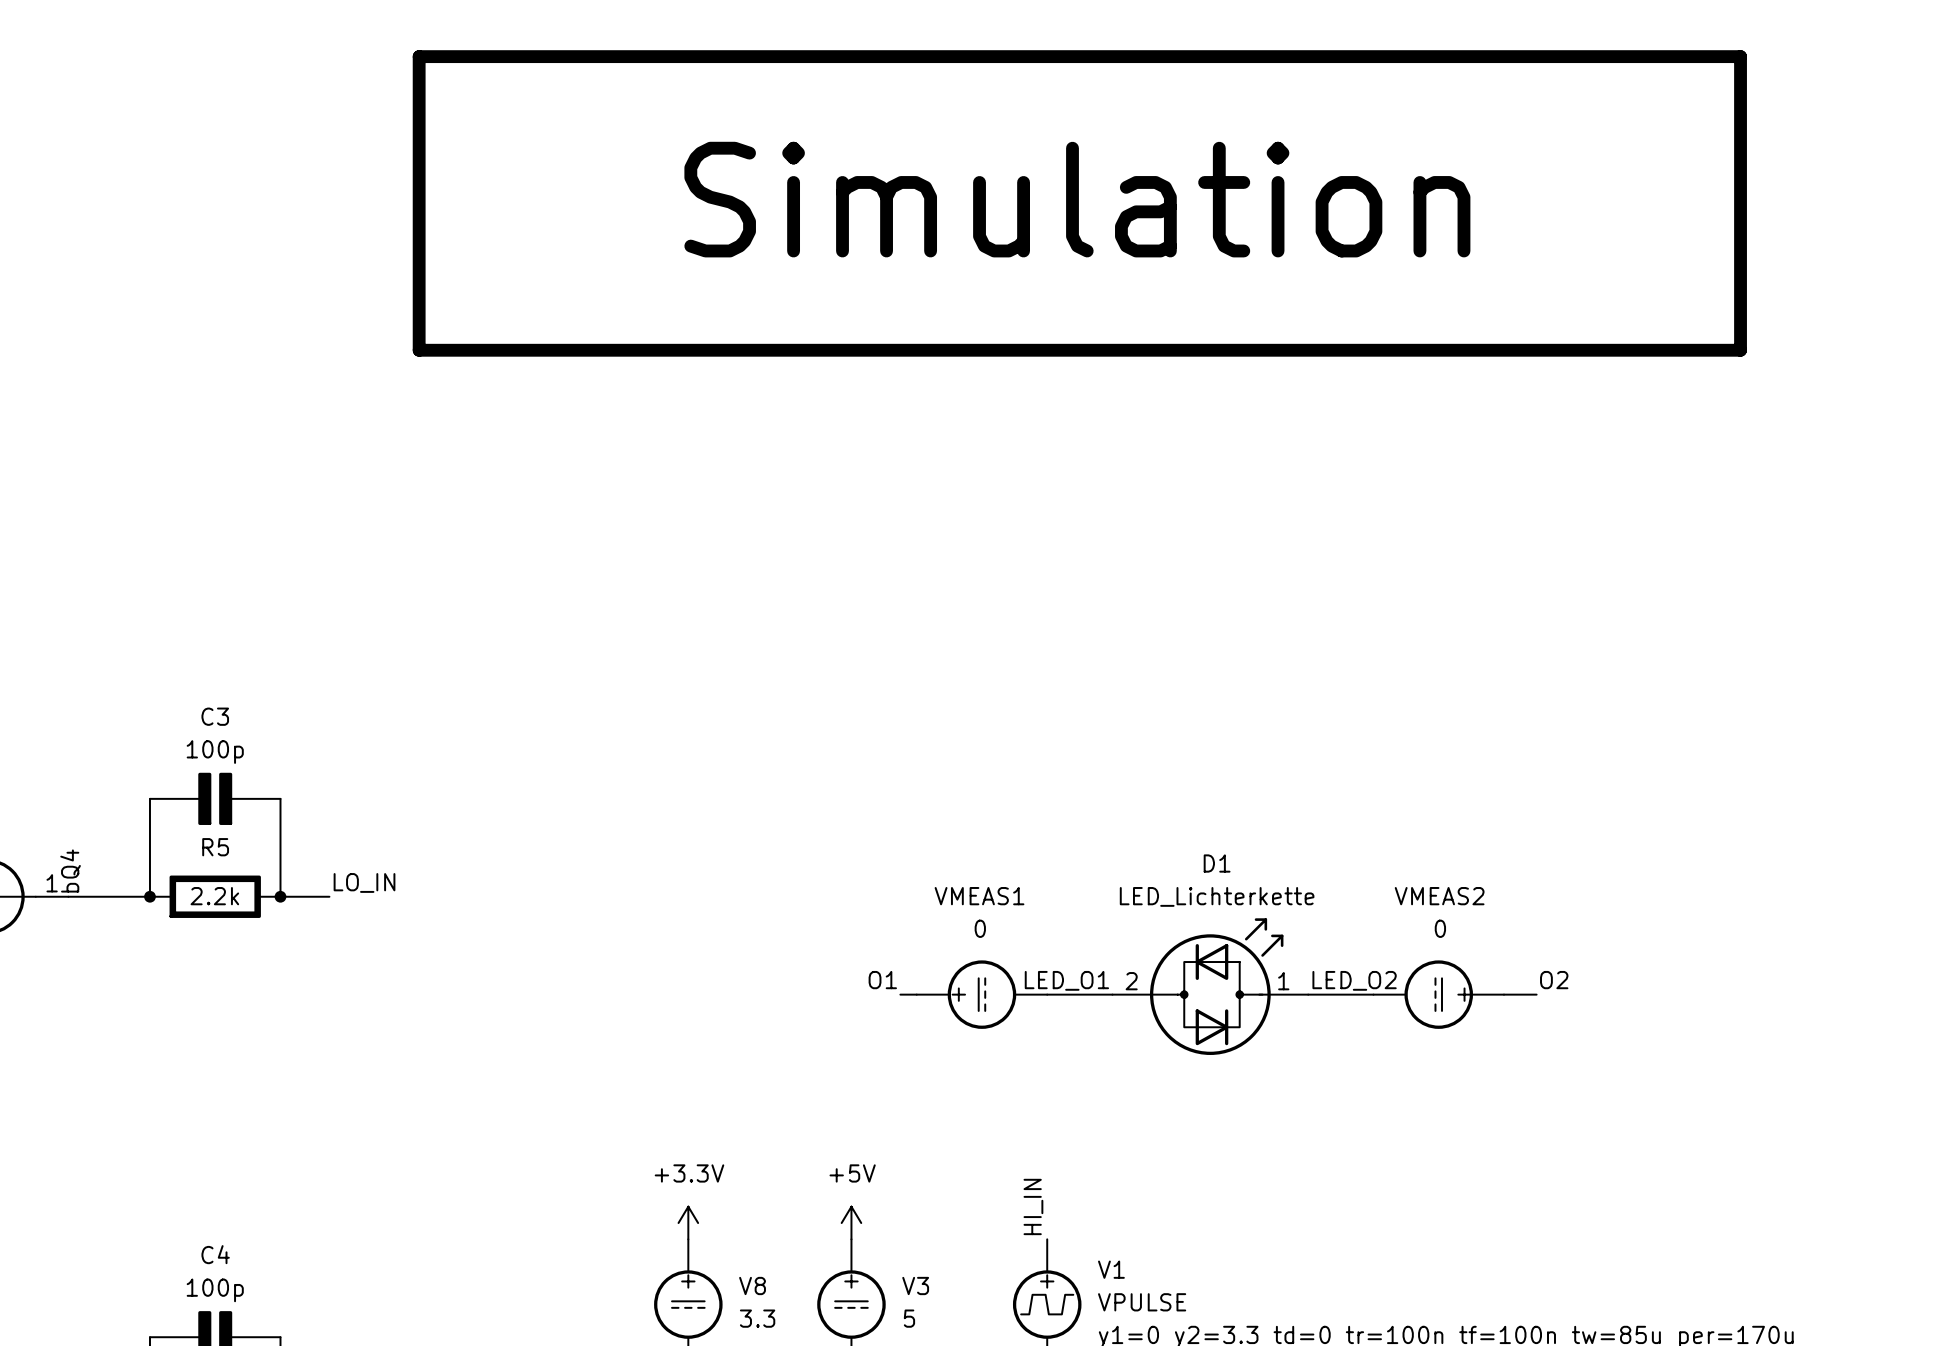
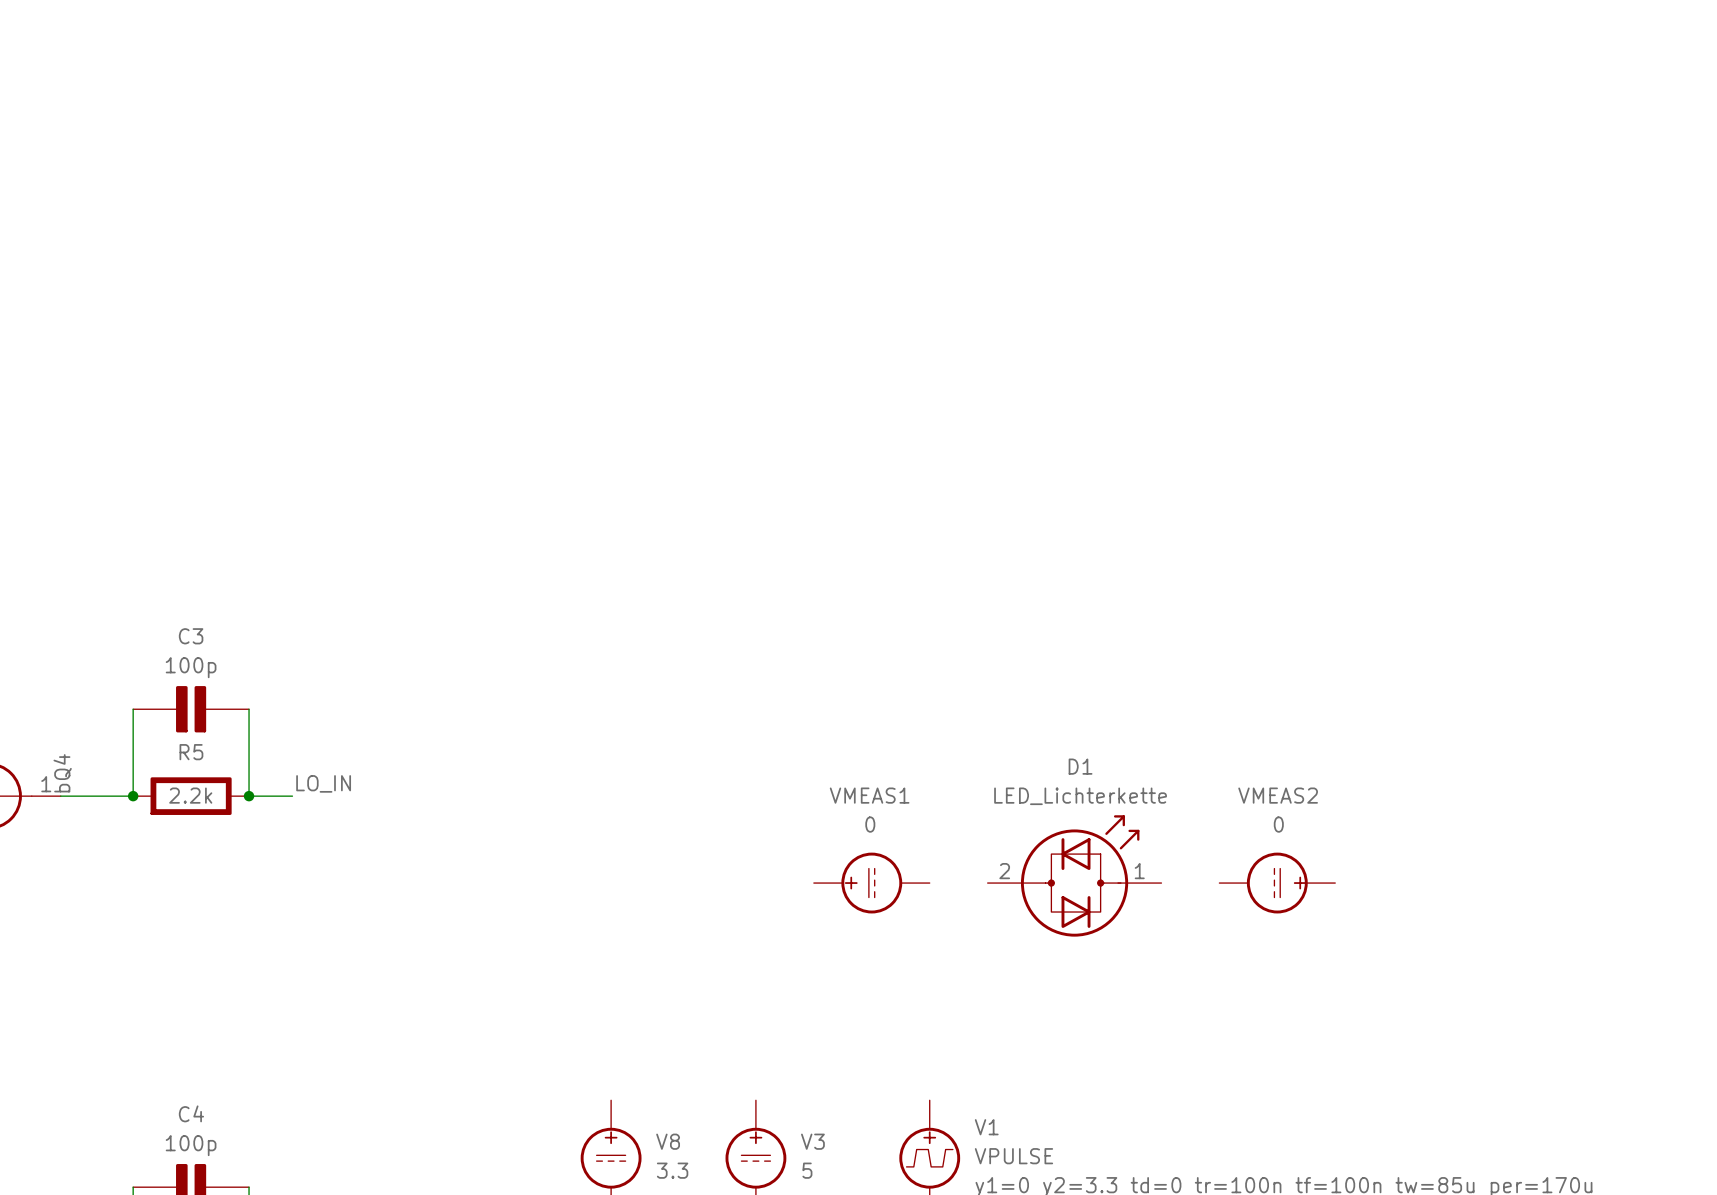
line: (419, 56) (1740, 56) (1740, 350) (419, 350) (419, 56) -> none
text: Simulation (1077, 199) -> none
label: O1 (882, 980) -> none
label: LED_O1 (1066, 980) -> none
label: LED_O2 (1354, 980) -> none
label: O2 (1554, 980) -> none
wire: (900, 994) (916, 994) -> none
wire: (1047, 994) (1112, 994) -> none
wire: (1308, 994) (1373, 994) -> none
wire: (1503, 994) (1536, 994) -> none
label: HI_IN (1033, 1206) -> none
power symbol: +3.3V (688, 1223) -> none
power symbol: +5V (851, 1223) -> none

